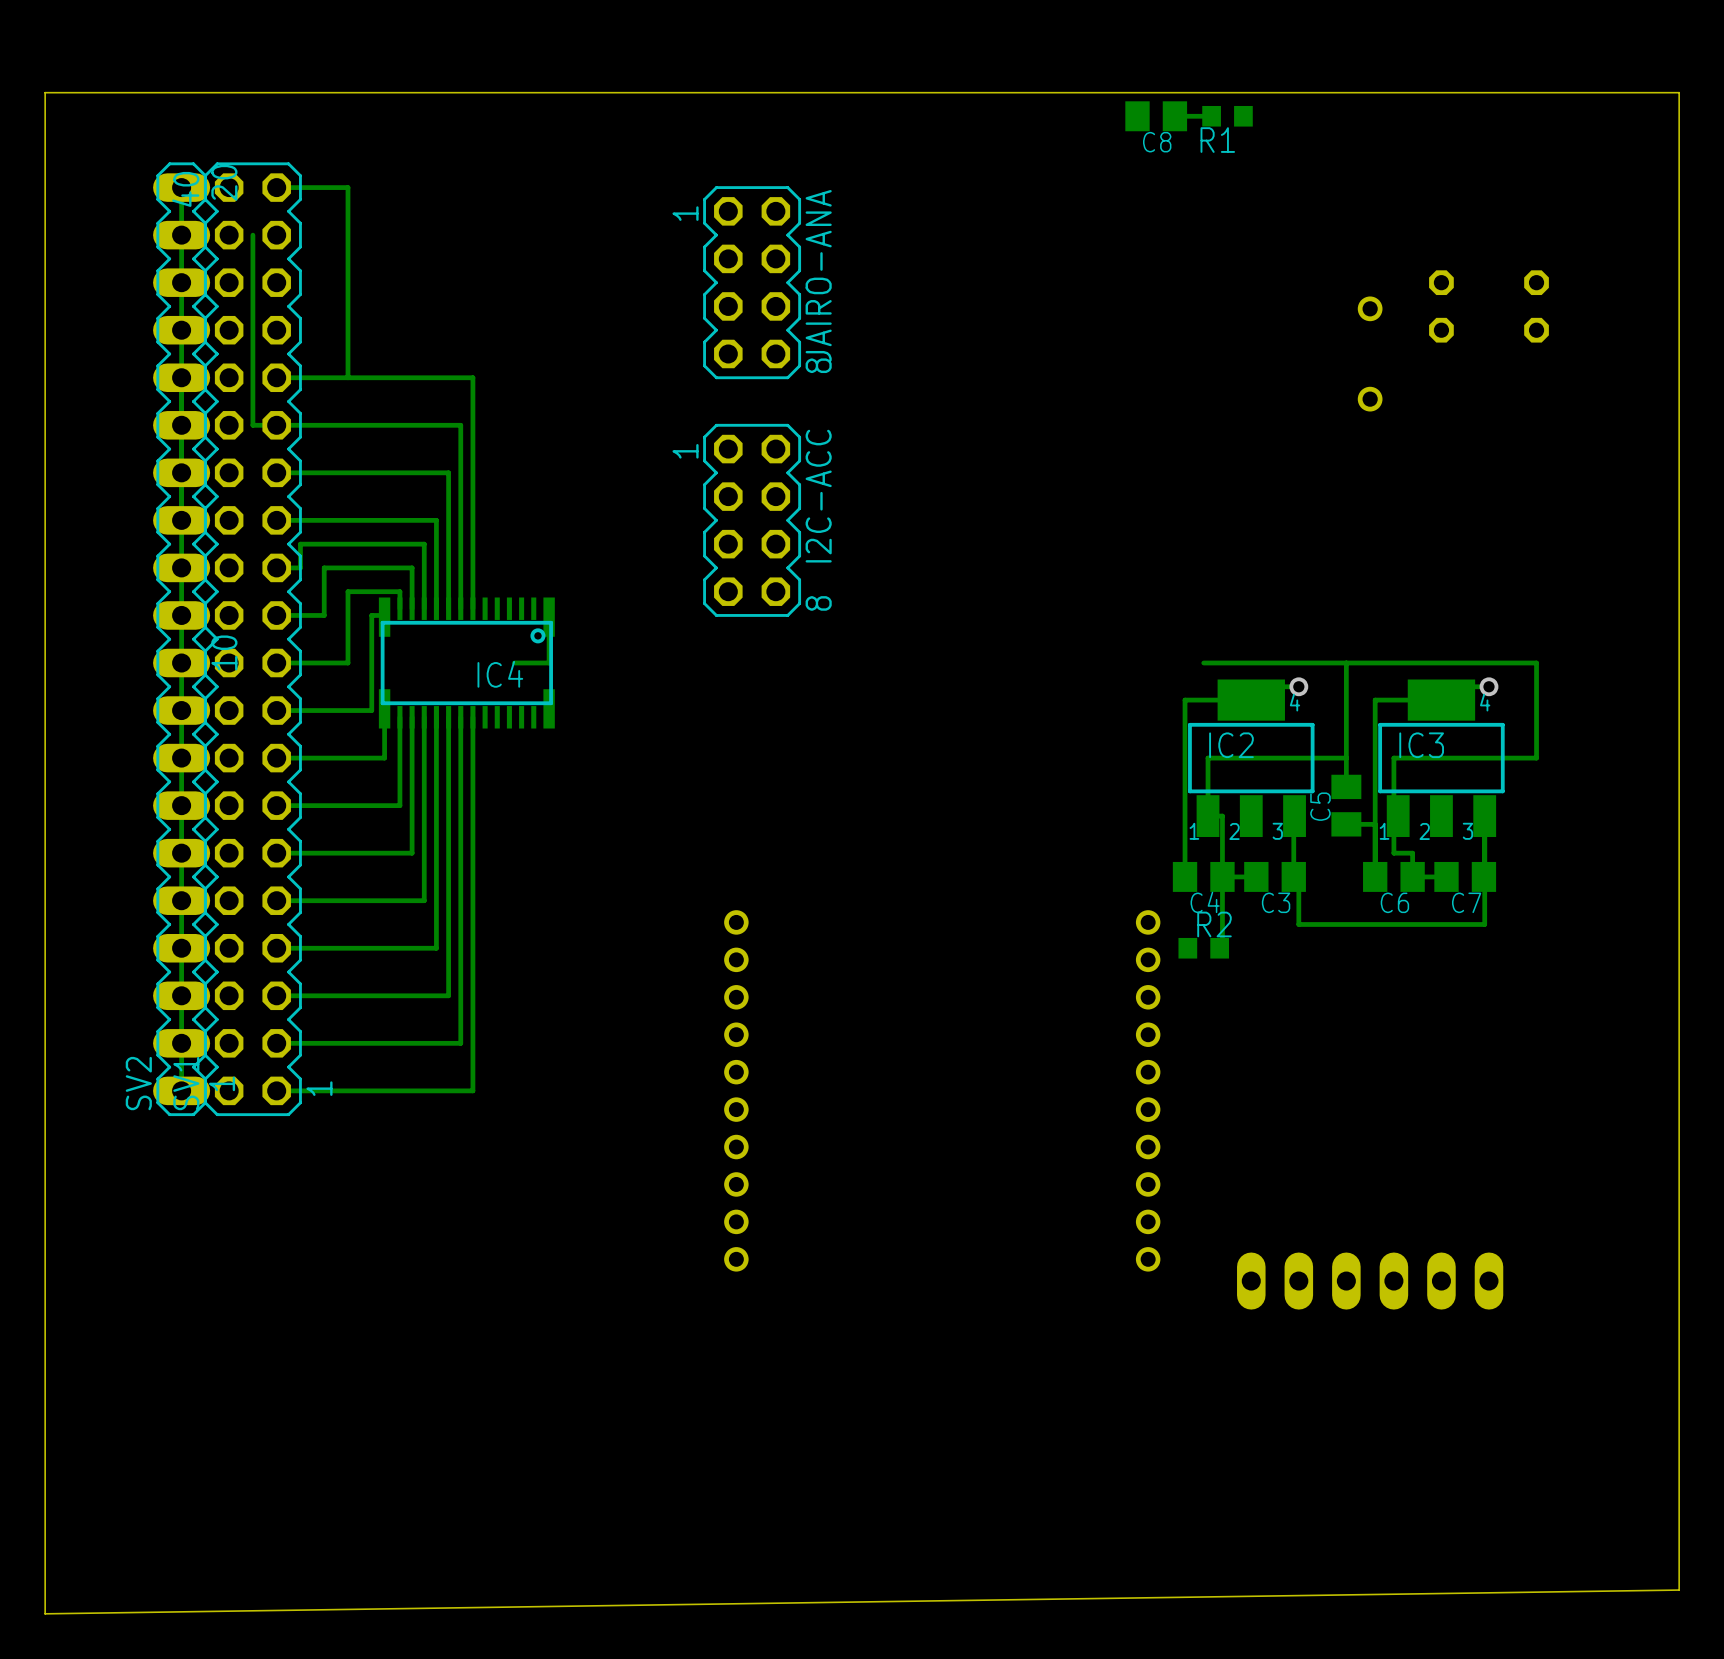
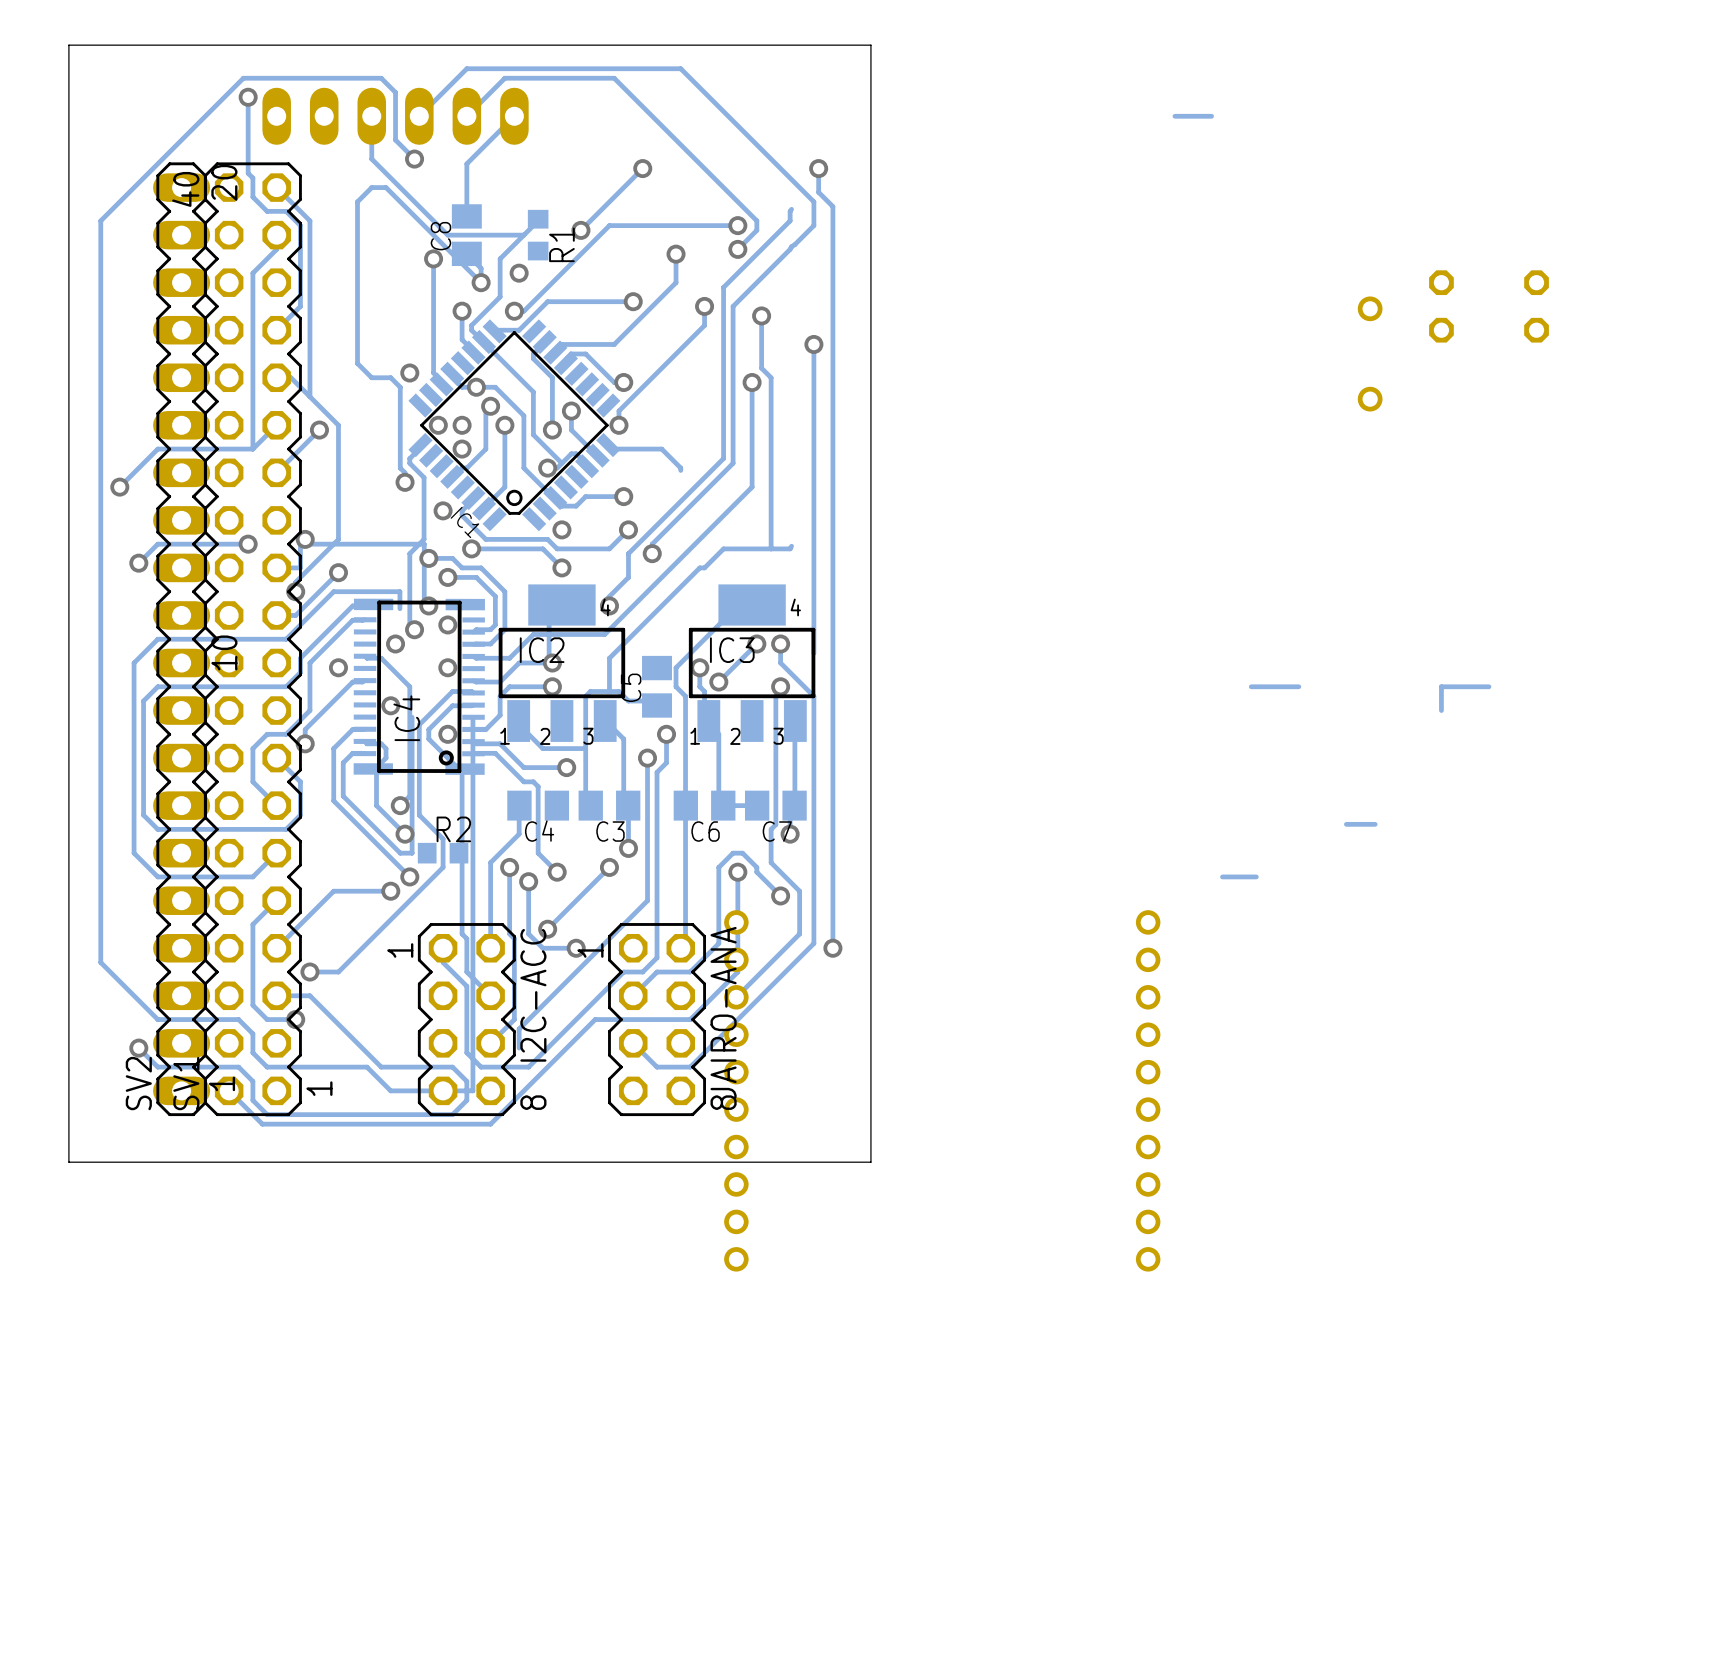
board edge: none -> (870, 45) (68, 45) (68, 1162) (870, 1162) (870, 45)
board edge: (1679, 92) (45, 92) (45, 1613) (1679, 1590) (1679, 92) -> none
track: none -> (248, 97) (248, 173) (252, 178) (252, 197) (267, 211) (286, 211) (300, 225) (300, 306) (276, 330)
via: none -> (248, 97)
track: none -> (371, 116) (371, 159) (447, 235) (523, 235)
part: none -> (395, 116)
track: none -> (419, 116) (466, 68) (680, 68) (813, 201) (813, 225) (733, 306) (733, 463) (652, 544) (652, 553)
track: none -> (466, 116) (504, 78) (614, 78) (756, 220) (756, 230) (737, 249)
track: none -> (514, 116) (466, 163) (466, 216)
C8 rotation: 0° (1156, 116) -> 90° clockwise (466, 235)
C8 position: (1156, 116) -> (466, 235)
R1 rotation: 0° (1227, 116) -> 90° clockwise (538, 235)
R1 position: (1227, 116) -> (538, 235)
R1 name position: R1 (1217, 140) -> R1 (561, 244)
via: none -> (414, 159)
track: none -> (642, 168) (580, 230)
via: none -> (642, 168)
track: none -> (818, 168) (818, 192) (832, 206) (832, 948)
via: none -> (818, 168)
track: (181, 187) (181, 1090) -> none
track: (276, 187) (347, 187) (347, 377) -> (276, 187) (309, 220) (309, 396)
track: none -> (791, 209) (790, 220) (723, 287) (723, 458) (628, 553) (628, 577) (604, 601) (609, 605)
track: none -> (538, 219) (500, 258) (500, 296) (471, 325) (471, 330) (533, 392) (533, 434) (561, 463)
track: none -> (737, 225) (609, 225) (523, 311) (514, 311)
via: none -> (737, 225)
via: none -> (580, 230)
track: (252, 235) (252, 273) -> (276, 235) (276, 249) (252, 273)
via: none -> (737, 249)
track: none -> (676, 254) (676, 282) (614, 344) (561, 344) (555, 352)
via: none -> (676, 254)
track: none -> (433, 258) (433, 373) (438, 377) (438, 382) (441, 384)
via: none -> (433, 258)
via: none -> (519, 273)
via: none -> (481, 282)
JAIRO-ANA: (752, 282) -> none
track: none -> (633, 301) (547, 301) (519, 330) (494, 331)
via: none -> (633, 301)
track: none -> (704, 306) (704, 325) (618, 411) (618, 425)
via: none -> (704, 306)
track: none -> (462, 311) (462, 339) (473, 352)
via: none -> (462, 311)
via: none -> (514, 311)
track: none -> (761, 315) (761, 368) (771, 377) (771, 548)
via: none -> (761, 315)
track: none -> (544, 342) (533, 353) (533, 358) (552, 377) (552, 430)
track: none -> (813, 344) (813, 653)
via: none -> (813, 344)
track: none -> (565, 363) (566, 358) (571, 353) (585, 353) (614, 382) (623, 382)
via: none -> (409, 373)
track: none -> (452, 373) (452, 377) (462, 387) (495, 387) (523, 415) (523, 468) (561, 506) (576, 506) (585, 496) (623, 496)
track: none -> (290, 377) (338, 425) (338, 539) (295, 582) (295, 591)
track: (371, 377) (290, 377) -> (371, 377) (357, 363) (357, 201) (371, 187) (386, 187) (481, 282) (481, 268) (466, 254)
track: (390, 377) (472, 377) (472, 608) -> (390, 377) (400, 387) (400, 468) (405, 472) (405, 482)
via: none -> (623, 382)
track: none -> (752, 382) (752, 487) (604, 634) (533, 634) (509, 658) (476, 658) (473, 656)
via: none -> (752, 382)
via: none -> (476, 387)
track: none -> (490, 406) (485, 411) (485, 449) (466, 468) (462, 468) (457, 472) (452, 472) (452, 476)
via: none -> (490, 406)
track: none -> (571, 411) (571, 430) (597, 455)
via: none -> (571, 411)
track: (252, 425) (460, 425) (460, 608) -> (252, 425) (252, 449)
track: none -> (276, 425) (252, 449)
via: none -> (438, 425)
via: none -> (462, 425)
track: none -> (504, 425) (504, 487) (484, 508)
via: none -> (504, 425)
IC1: none -> (514, 425)
via: none -> (618, 425)
via: none -> (319, 430)
via: none -> (552, 430)
track: none -> (420, 445) (419, 449) (409, 458) (409, 463) (424, 477) (424, 539) (409, 553) (409, 624) (414, 629)
track: none -> (608, 445) (609, 449) (661, 449) (680, 468) (680, 470)
track: none -> (252, 449) (157, 449) (119, 487)
via: none -> (462, 449)
track: none -> (587, 466) (576, 453) (571, 453) (557, 468) (547, 468)
via: none -> (547, 468)
track: (276, 472) (448, 472) (448, 608) -> (276, 472) (319, 430)
via: none -> (405, 482)
via: none -> (119, 487)
via: none -> (623, 496)
track: none -> (473, 497) (462, 510) (462, 515) (485, 539) (547, 539) (557, 548) (609, 548) (628, 529)
via: none -> (443, 510)
track: (276, 520) (436, 520) (436, 608) -> none
I2C-ACC position: (752, 520) -> (466, 1019)
via: none -> (561, 529)
via: none -> (628, 529)
via: none -> (305, 539)
track: none -> (248, 544) (157, 544) (138, 563)
via: none -> (248, 544)
track: none -> (791, 546) (790, 548) (723, 548) (704, 567) (699, 567) (609, 658) (609, 691)
track: none -> (471, 548) (542, 548) (561, 567)
via: none -> (471, 548)
via: none -> (652, 553)
track: none -> (428, 558) (452, 558) (462, 567) (481, 567) (504, 591) (504, 629) (490, 643) (473, 644)
via: none -> (428, 558)
via: none -> (138, 563)
via: none -> (561, 567)
via: none -> (338, 572)
track: none -> (447, 577) (476, 577) (495, 596) (495, 624) (490, 629) (476, 629) (473, 632)
via: none -> (447, 577)
via: none -> (295, 591)
track: (347, 591) (347, 663) (276, 663) -> (347, 591) (333, 591) (286, 639) (157, 639) (134, 663) (134, 853) (157, 876) (252, 876) (276, 853)
via: none -> (428, 605)
via: none -> (609, 605)
track: none -> (752, 605) (737, 605) (676, 667) (676, 686) (685, 696) (685, 943) (680, 948)
track: (412, 608) (412, 567) (324, 567) (324, 615) (295, 615) -> (338, 572) (295, 615)
track: (384, 617) (384, 615) (371, 615) (371, 710) (276, 710) -> none
via: none -> (447, 624)
via: none -> (414, 629)
via: none -> (395, 643)
track: none -> (756, 643) (718, 682)
via: none -> (756, 643)
track: none -> (780, 643) (780, 663) (813, 696) (813, 943) (690, 1067) (657, 1067) (633, 1043)
via: none -> (780, 643)
track: none -> (365, 656) (367, 658) (381, 658) (409, 686) (409, 796) (400, 805)
IC4 rotation: 0° (466, 663) -> 90.1° clockwise (419, 686)
track: (519, 663) (514, 663) -> (519, 663) (500, 682) (473, 680)
via: none -> (552, 663)
track: (1203, 663) (1536, 663) (1536, 758) (1393, 758) (1393, 853) (1412, 853) (1412, 876) (1446, 876) -> none
track: (1346, 663) (1346, 786) -> none
via: none -> (338, 667)
via: none -> (447, 667)
track: none -> (699, 667) (699, 686) (704, 691) (704, 720) (708, 721) (709, 724) (718, 734) (718, 805) (757, 805)
via: none -> (699, 667)
track: none -> (365, 680) (352, 682) (305, 729) (305, 743)
via: none -> (718, 682)
track: none -> (552, 686) (509, 686) (500, 696) (500, 715) (485, 729) (473, 729)
via: none -> (552, 686)
track: none -> (780, 686) (780, 691) (775, 696) (775, 824) (771, 829) (771, 862) (799, 891) (799, 933) (733, 1000)
via: none -> (780, 686)
via: (1298, 686) -> none
via: (1488, 686) -> none
track: none -> (473, 692) (452, 691) (419, 724) (419, 815) (443, 838) (443, 867) (338, 972) (309, 972)
track: (1251, 700) (1185, 700) (1185, 876) -> none
track: (1441, 700) (1375, 700) (1375, 876) -> none
via: none -> (390, 705)
track: none -> (473, 705) (452, 705) (428, 729) (428, 739) (462, 772) (462, 933) (466, 938) (466, 972) (490, 995)
track: none -> (657, 705) (657, 701) (628, 701) (618, 691) (590, 691) (585, 696) (585, 805)
track: (384, 708) (384, 758) (276, 758) -> (373, 604) (352, 605) (300, 658) (300, 672) (286, 686) (157, 686) (143, 701) (143, 815) (157, 829) (286, 829) (300, 815) (300, 781) (276, 758)
track: (399, 717) (399, 805) (276, 805) -> (365, 619) (352, 620) (309, 663) (309, 710) (286, 734) (267, 734) (252, 748) (252, 781) (276, 805)
track: (424, 717) (424, 900) (276, 900) -> (295, 1019) (267, 1019) (252, 1005) (252, 924) (276, 900)
track: (436, 717) (436, 948) (276, 948) -> (390, 891) (333, 891) (276, 948)
track: (448, 717) (448, 995) (309, 995) -> (138, 1048) (157, 1067) (238, 1067) (252, 1081) (252, 1100) (267, 1114) (452, 1114) (466, 1100) (466, 1081) (452, 1067) (381, 1067) (309, 995)
track: (460, 717) (460, 1043) (276, 1043) -> none
track: none -> (518, 721) (519, 724) (542, 748) (585, 748)
track: none -> (605, 721) (623, 739) (623, 805) (628, 805) (628, 848)
track: none -> (795, 721) (794, 805) (790, 805) (790, 834)
track: none -> (364, 729) (352, 729) (333, 748) (333, 800) (409, 876)
via: none -> (447, 734)
track: none -> (666, 734) (666, 762) (657, 772) (657, 957) (642, 972) (623, 972) (528, 1067) (481, 1067) (466, 1052) (466, 986) (443, 962) (443, 948)
via: none -> (666, 734)
track: none -> (364, 741) (367, 743) (381, 743) (386, 748) (386, 758) (373, 768) (376, 772) (376, 805) (405, 834)
track: none -> (473, 741) (476, 743) (500, 743) (523, 767) (566, 767)
via: none -> (305, 743)
track: none -> (473, 753) (495, 753) (523, 781) (533, 781) (538, 786) (538, 853) (557, 872)
track: none -> (647, 758) (647, 900) (519, 1029) (519, 1048)
via: none -> (647, 758)
IC2 position: (1251, 758) -> (561, 663)
track: (1346, 758) (1208, 758) (1208, 816) (1222, 816) (1222, 948) (1219, 948) -> none
IC3 position: (1441, 758) -> (752, 663)
via: none -> (566, 767)
via: none -> (400, 805)
track: none -> (519, 805) (519, 834) (490, 862) (490, 948)
C5 position: (1346, 805) -> (657, 686)
track: (1484, 816) (1484, 924) (1298, 924) (1298, 876) (1293, 876) (1294, 816) -> none
via: none -> (405, 834)
via: none -> (790, 834)
via: none -> (628, 848)
track: (400, 853) (276, 853) -> (400, 853) (343, 796) (343, 762) (352, 753) (364, 753)
track: none -> (509, 867) (509, 933) (514, 938) (514, 1019) (490, 1043)
via: none -> (509, 867)
track: none -> (609, 867) (547, 929)
via: none -> (609, 867)
via: none -> (557, 872)
track: none -> (737, 872) (737, 972) (690, 1019) (595, 1019) (490, 1124) (262, 1124) (229, 1090)
via: none -> (737, 872)
via: none -> (409, 876)
C4 position: (1203, 876) -> (538, 805)
C3 position: (1275, 876) -> (609, 805)
C6 position: (1393, 876) -> (704, 805)
C7 position: (1465, 876) -> (775, 805)
track: none -> (528, 881) (528, 933) (542, 948) (576, 948)
via: none -> (528, 881)
via: none -> (390, 891)
track: none -> (780, 895) (756, 872) (756, 867) (742, 853) (733, 853) (718, 867) (718, 943) (690, 972) (657, 972) (633, 995)
via: none -> (780, 895)
via: none -> (547, 929)
via: none -> (576, 948)
via: none -> (832, 948)
R2 position: (1203, 948) -> (443, 853)
via: none -> (309, 972)
via: none -> (295, 1019)
JAIRO-ANA: none -> (657, 1019)
via: none -> (138, 1048)
track: (390, 1090) (276, 1090) -> (390, 1090) (367, 1067) (267, 1067) (252, 1052) (252, 1033) (238, 1019) (157, 1019) (100, 962) (100, 220) (243, 78) (381, 78) (395, 92) (395, 140) (414, 159)
part: (1370, 1281) -> none

